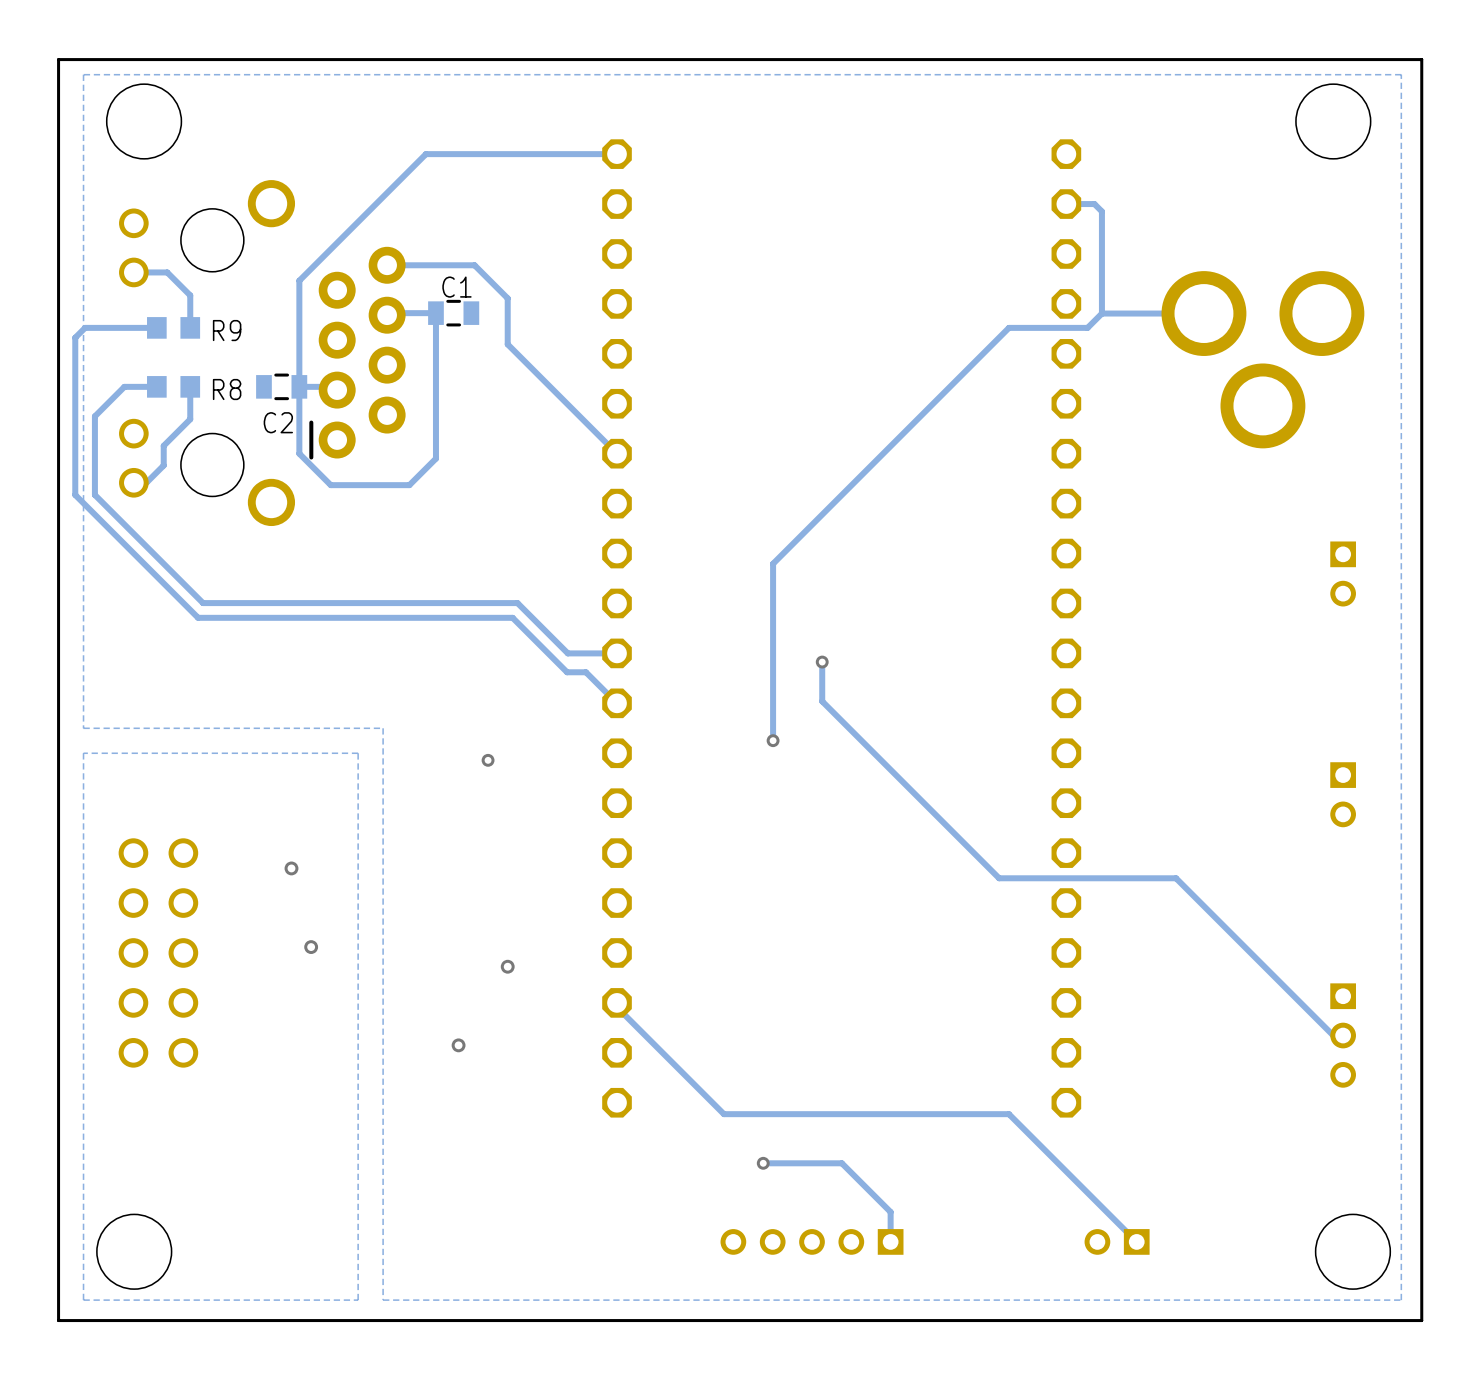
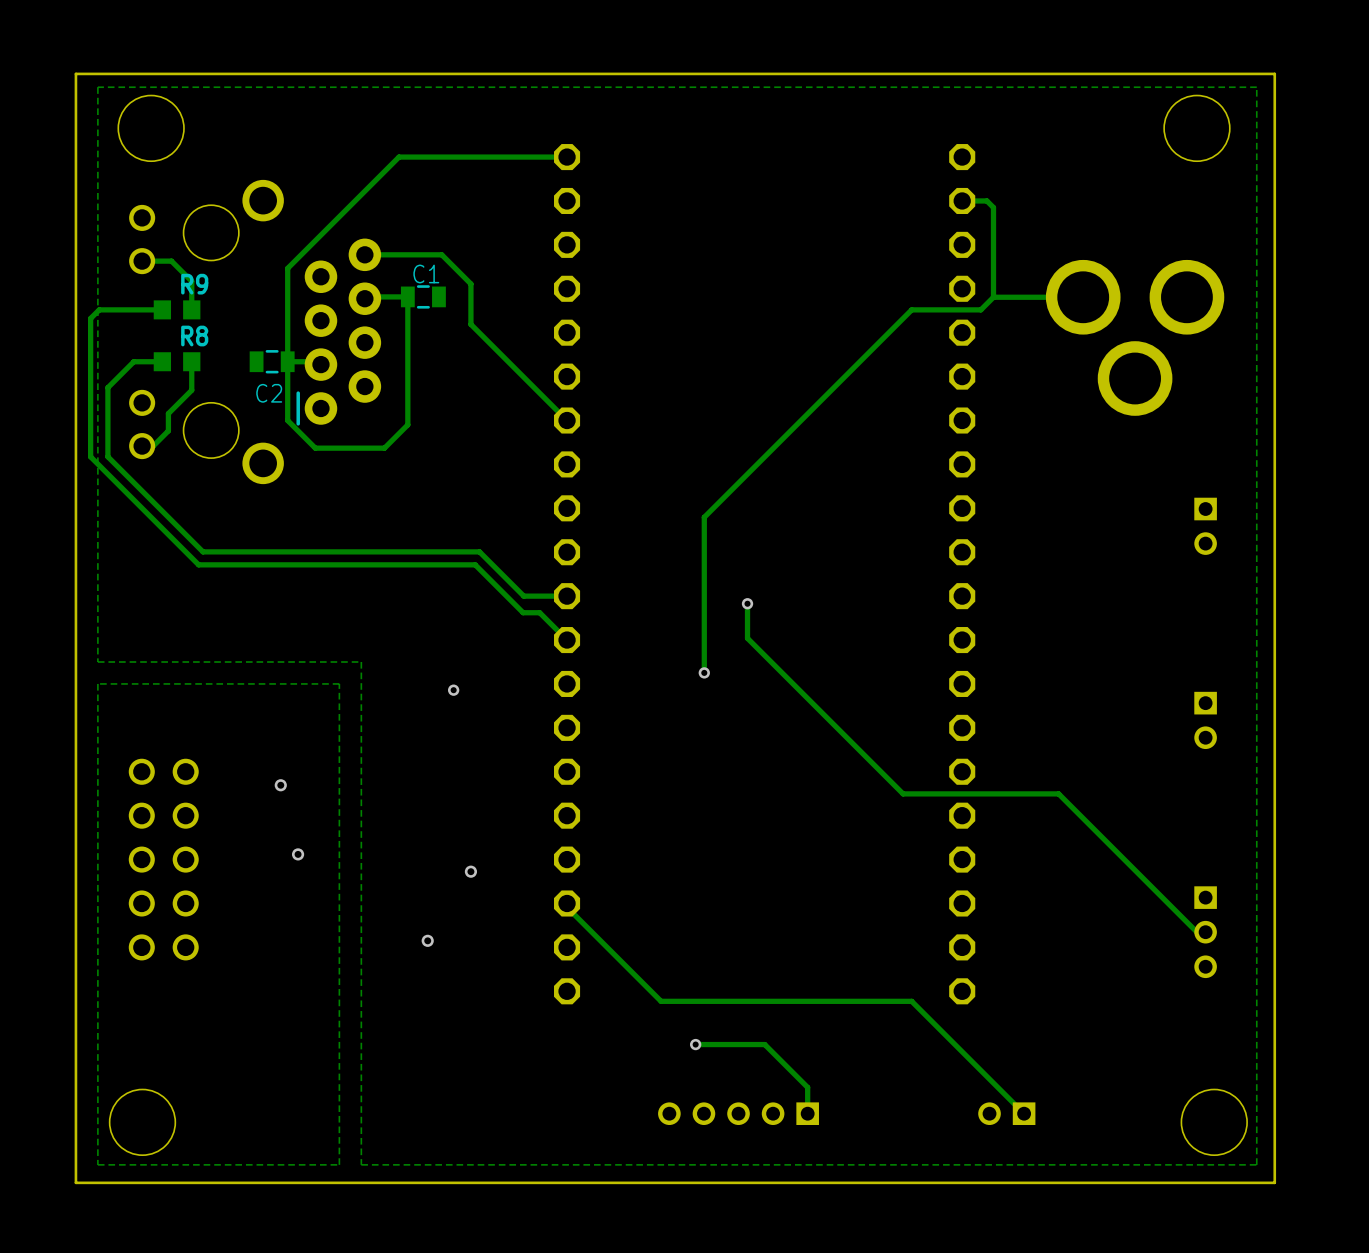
R9 name position: R9 (227, 330) -> R9 (194, 284)
R8 name position: R8 (227, 389) -> R8 (194, 336)

